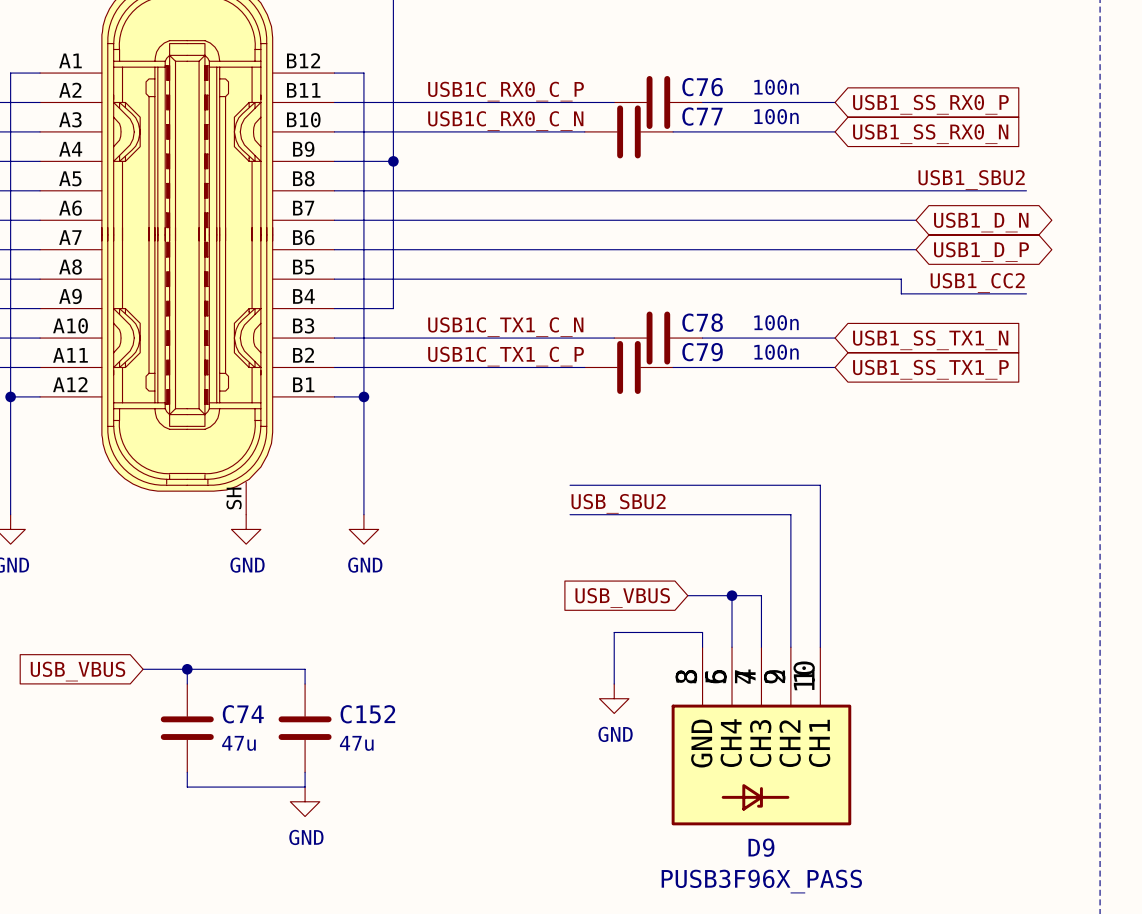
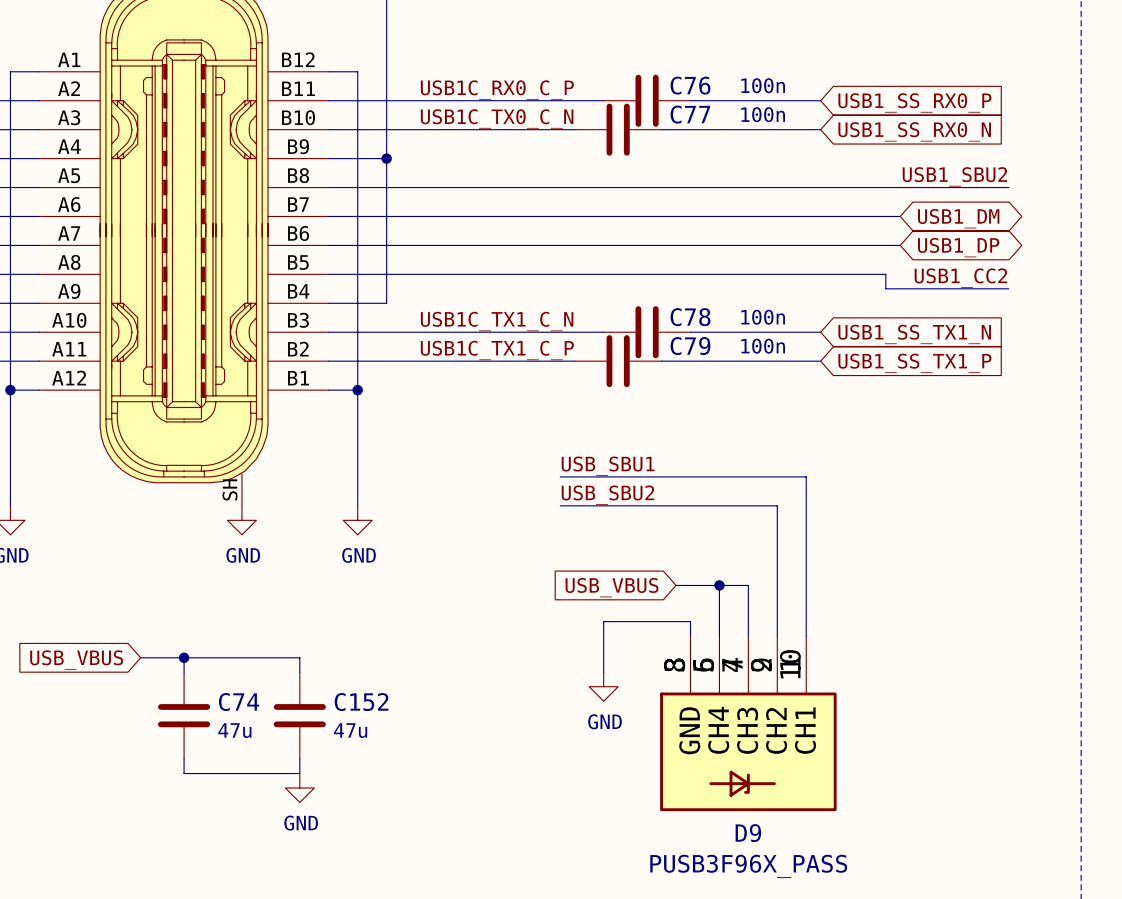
label: USB1C_RX0_C_N (505, 121) -> USB1C_TX0_C_N (497, 118)
global label: USB1_D_N (981, 222) -> USB1_DM (958, 218)
global label: USB1_D_P (981, 251) -> USB1_DP (958, 247)
label: none -> USB_SBU1 (608, 466)

